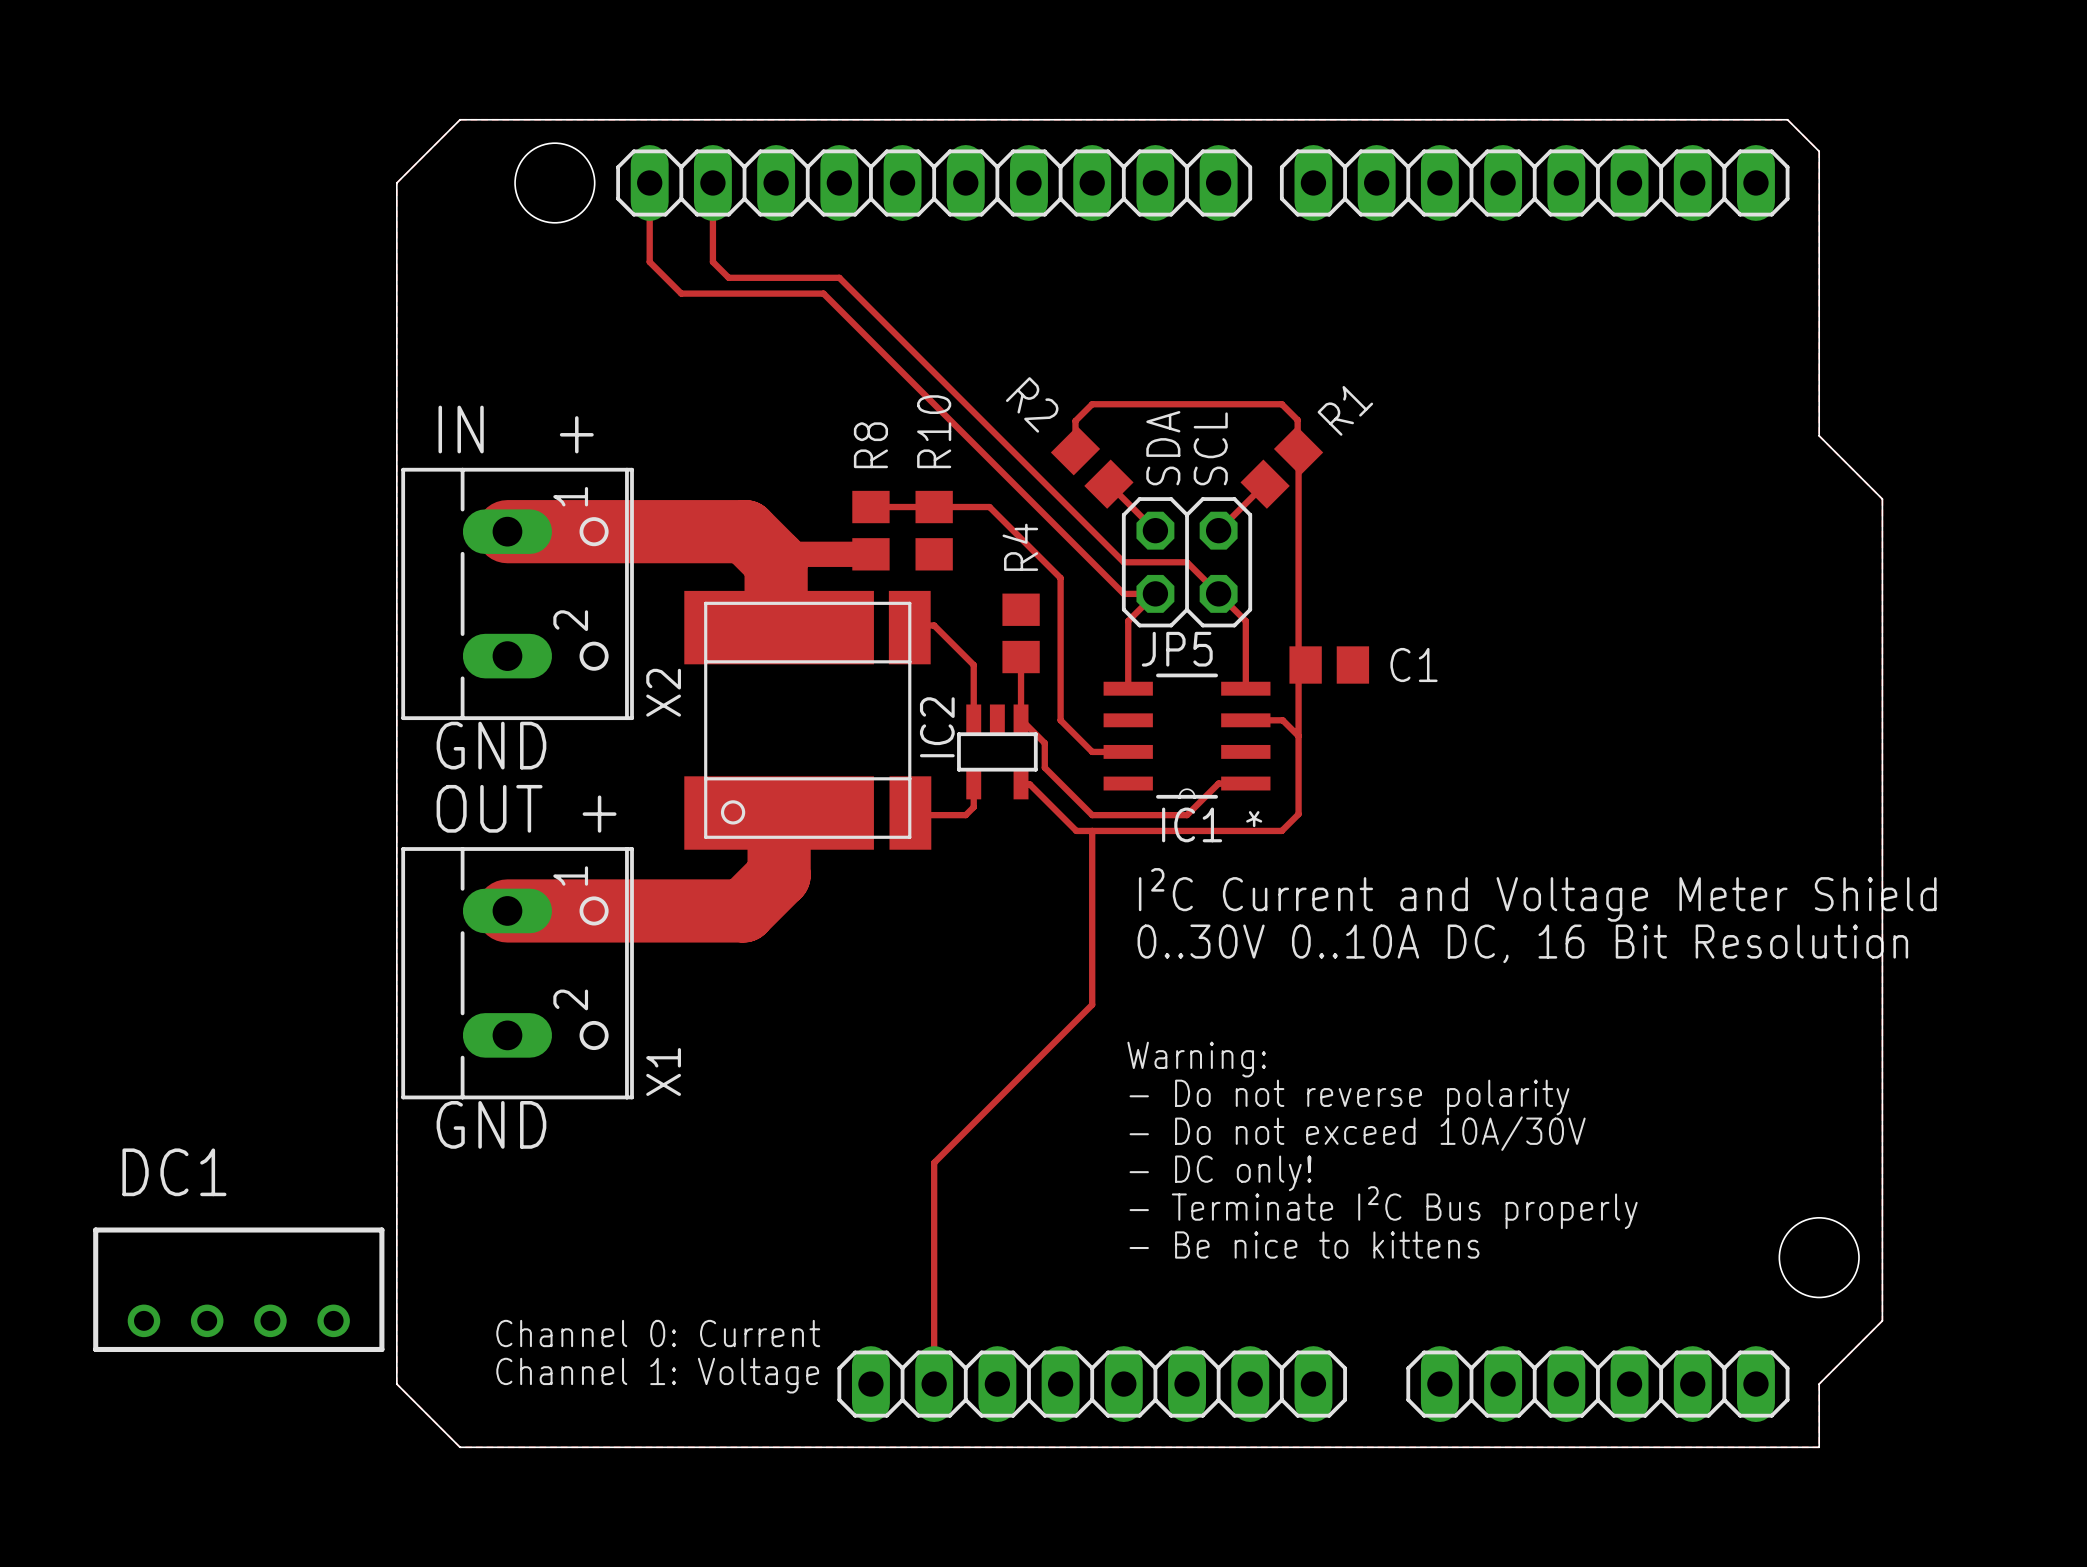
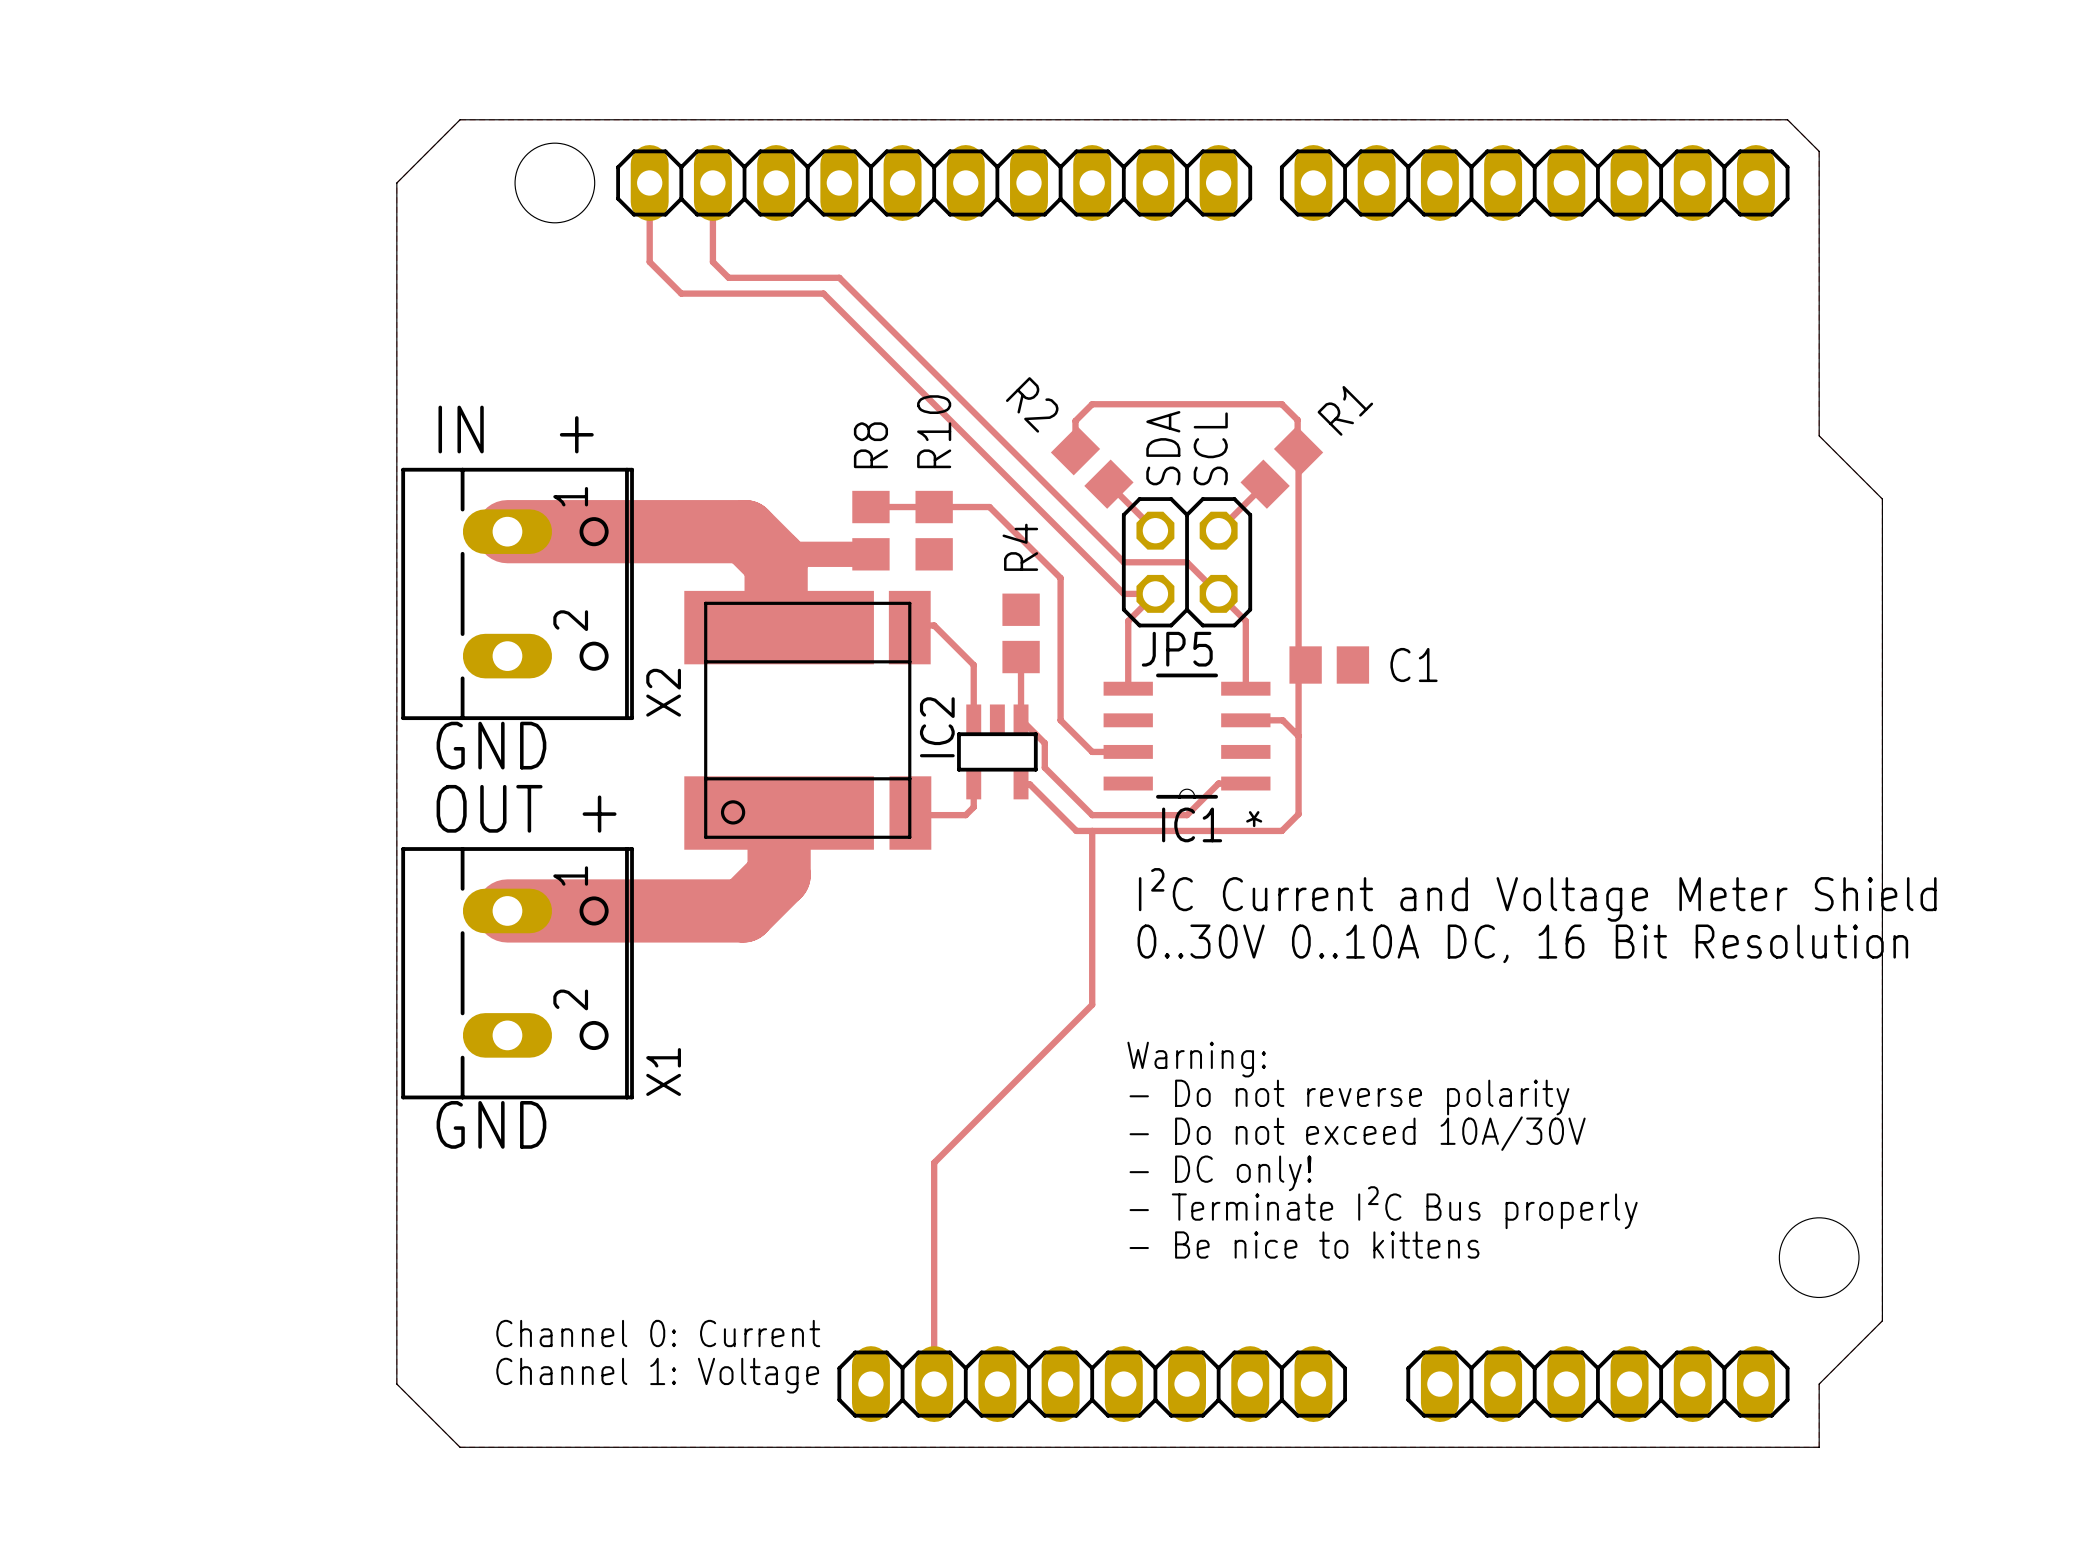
DC1: (238, 1289) -> none

